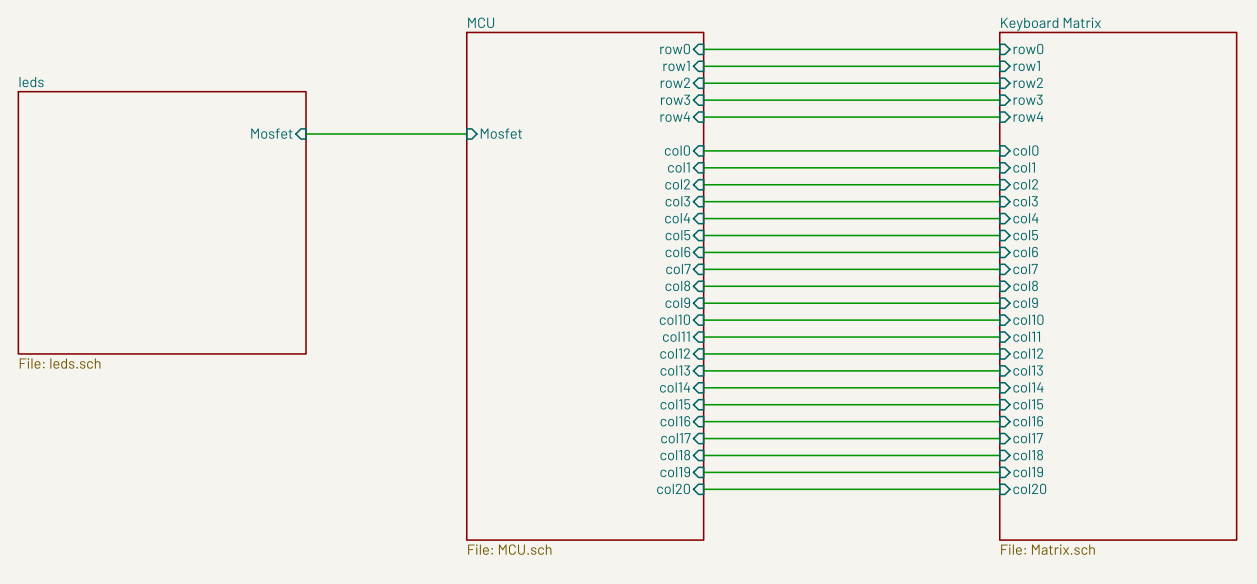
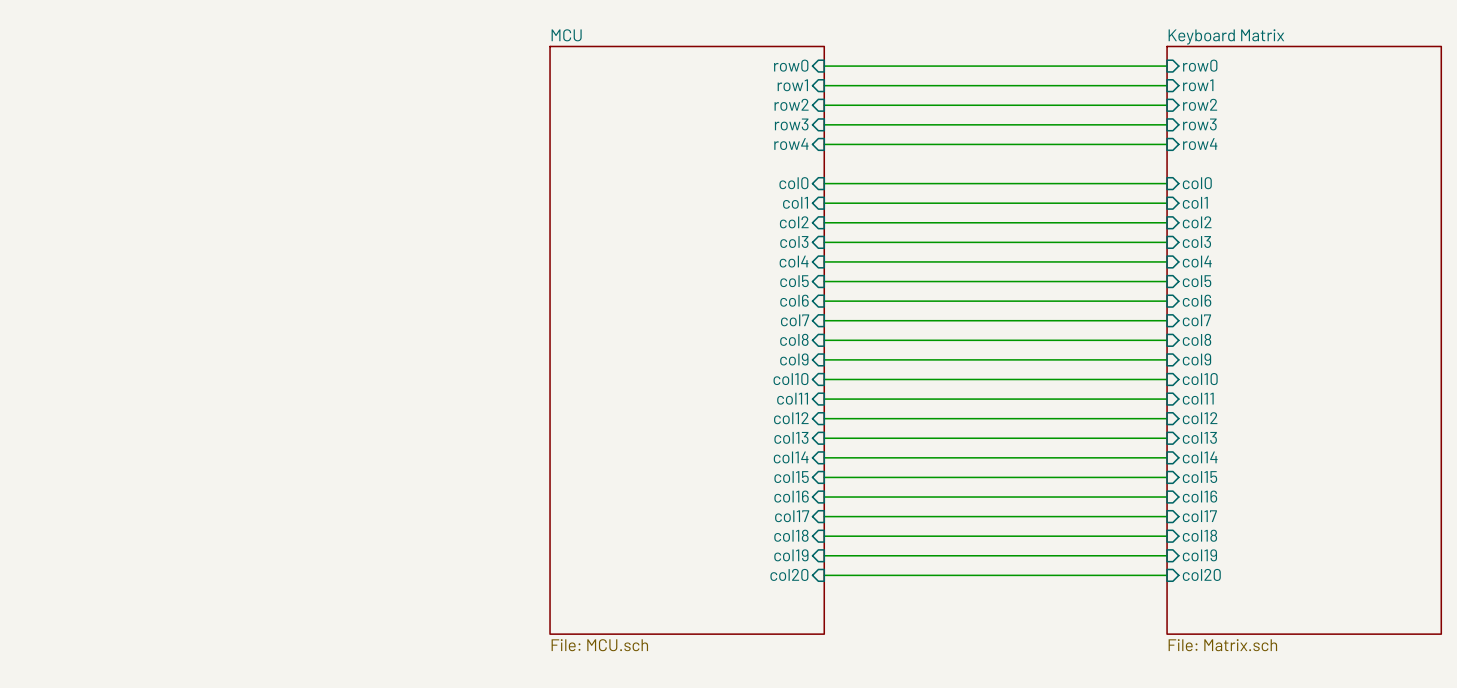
sheet pin: Mosfet (271, 133) -> none
wire: (306, 133) (466, 133) -> none
sheet pin: Mosfet (501, 133) -> none
sheet leds: File: leds.sch (162, 222) -> none

